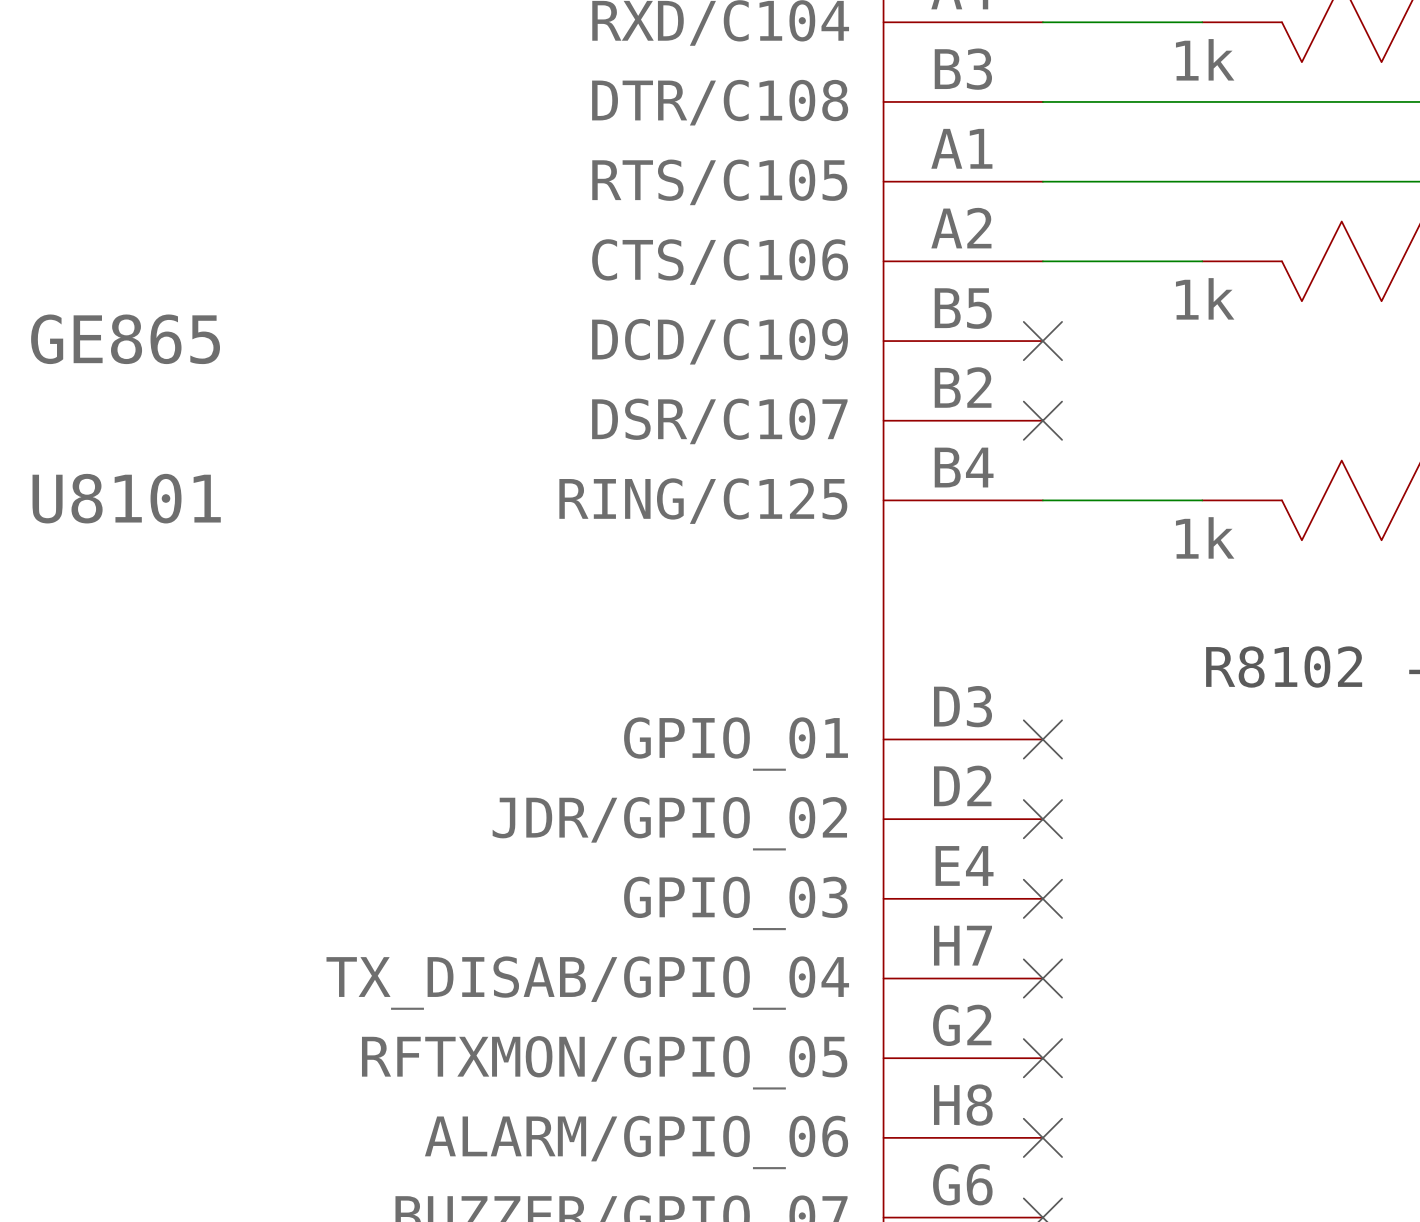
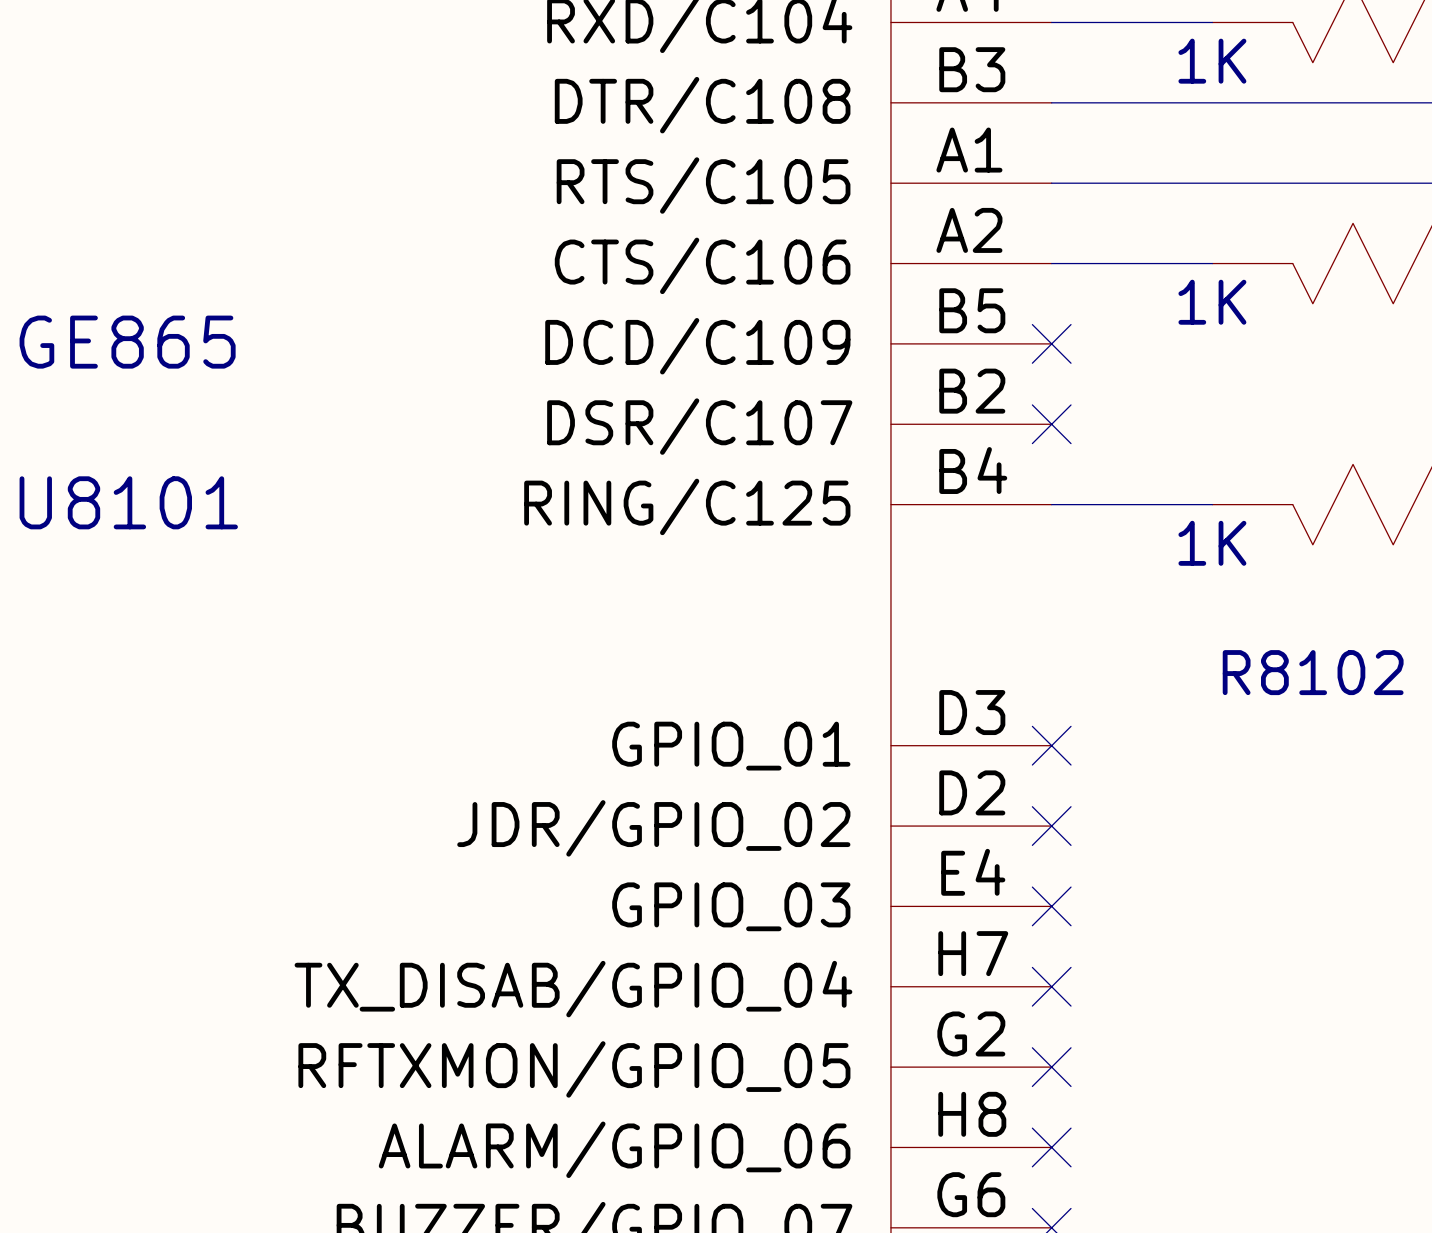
part value: 1k (1205, 59) -> 1K (1212, 61)
part value: 1k (1205, 298) -> 1K (1212, 302)
part value: 1k (1205, 537) -> 1K (1212, 543)

